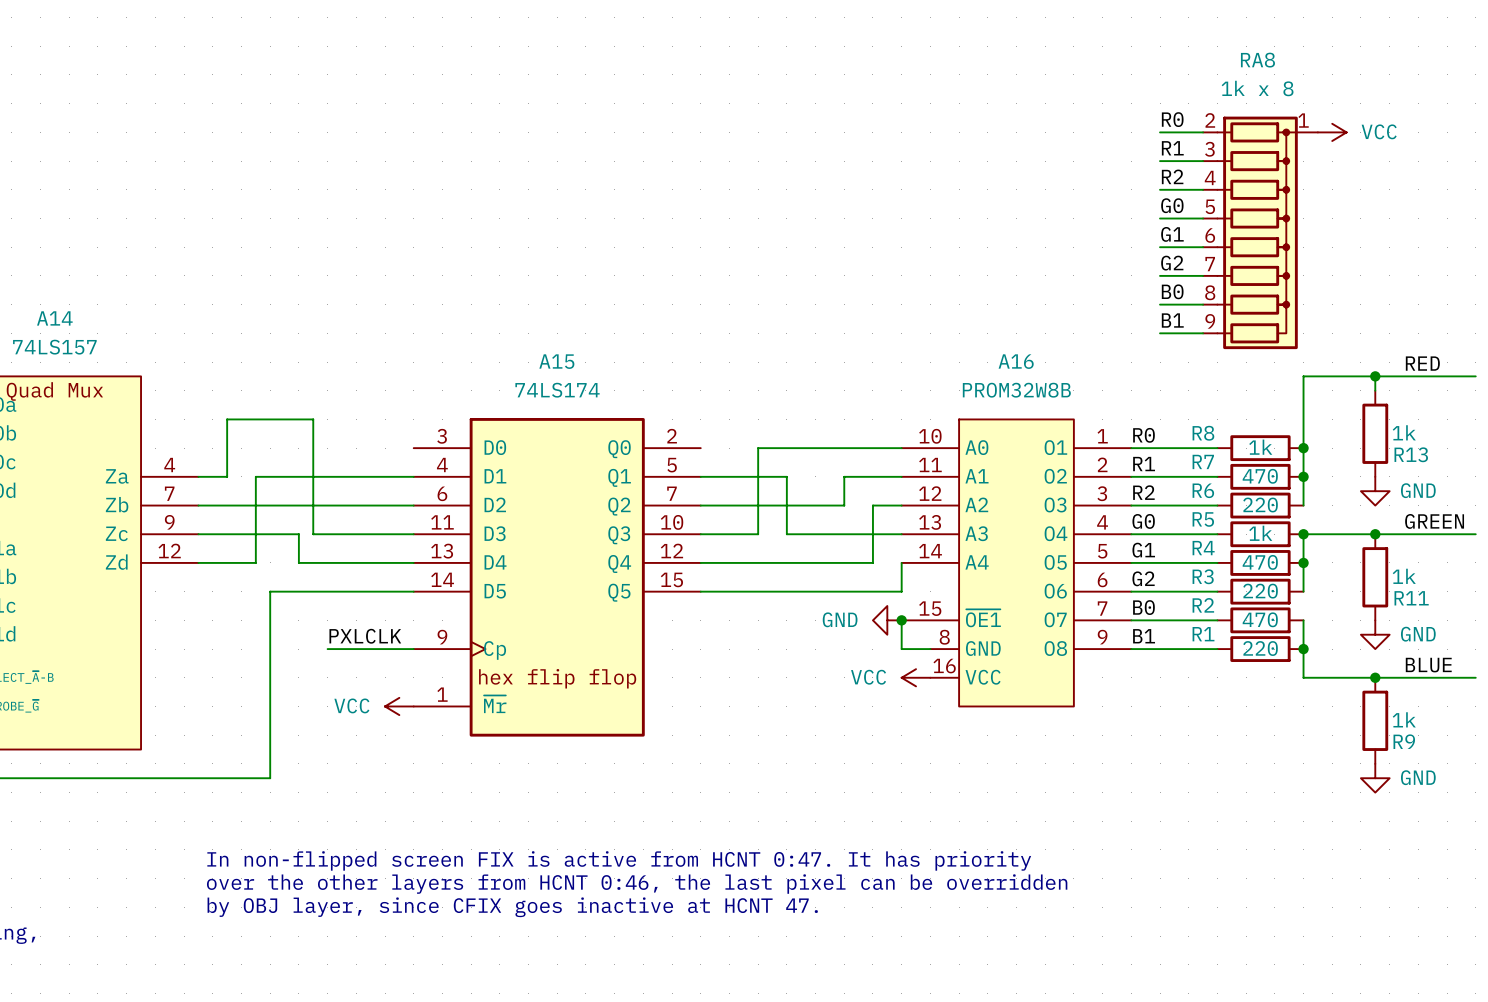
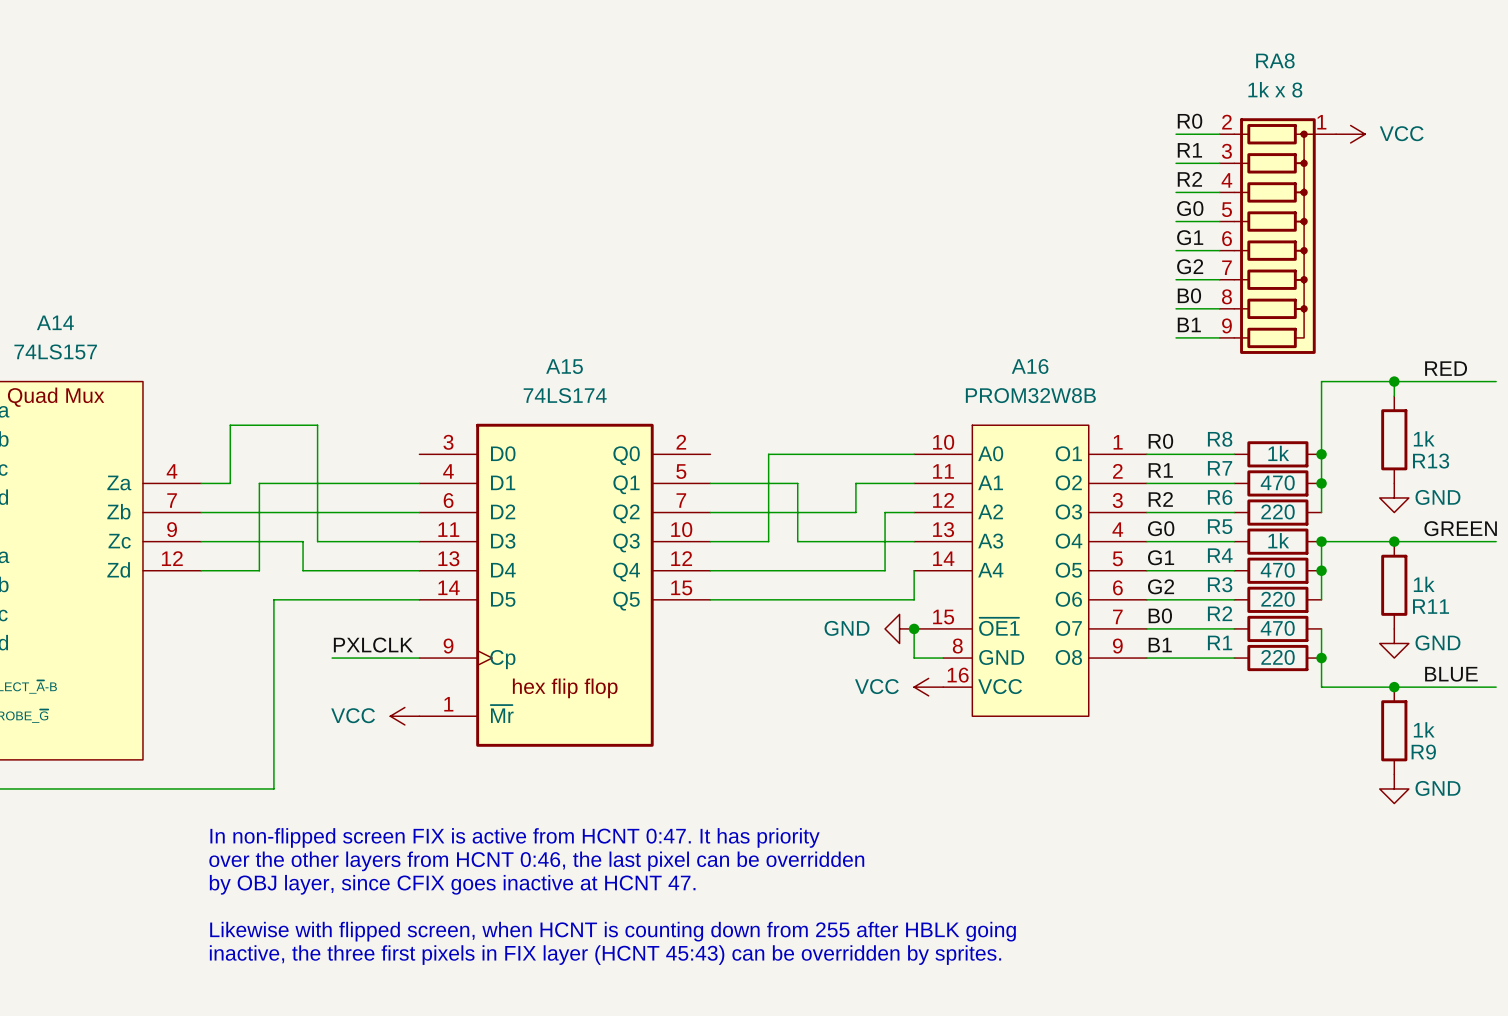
text position: In non-flipped screen FIX is active from HCNT 0:47. It has priority (619, 860) -> In non-flipped screen FIX is active from HCNT 0:47. It has priority (515, 837)
text position: over the other layers from HCNT 0:46, the last pixel can be overridden (637, 884) -> over the other layers from HCNT 0:46, the last pixel can be overridden (536, 861)
text position: by OBJ layer, since CFIX goes inactive at HCNT 47. (512, 907) -> by OBJ layer, since CFIX goes inactive at HCNT 47. (452, 884)
text: none -> Likewise with flipped screen, when HCNT is counting down from 255 after HBLK going (613, 931)
text: none -> inactive, the three first pixels in FIX layer (HCNT 45:43) can be overridden by sprites. (605, 955)

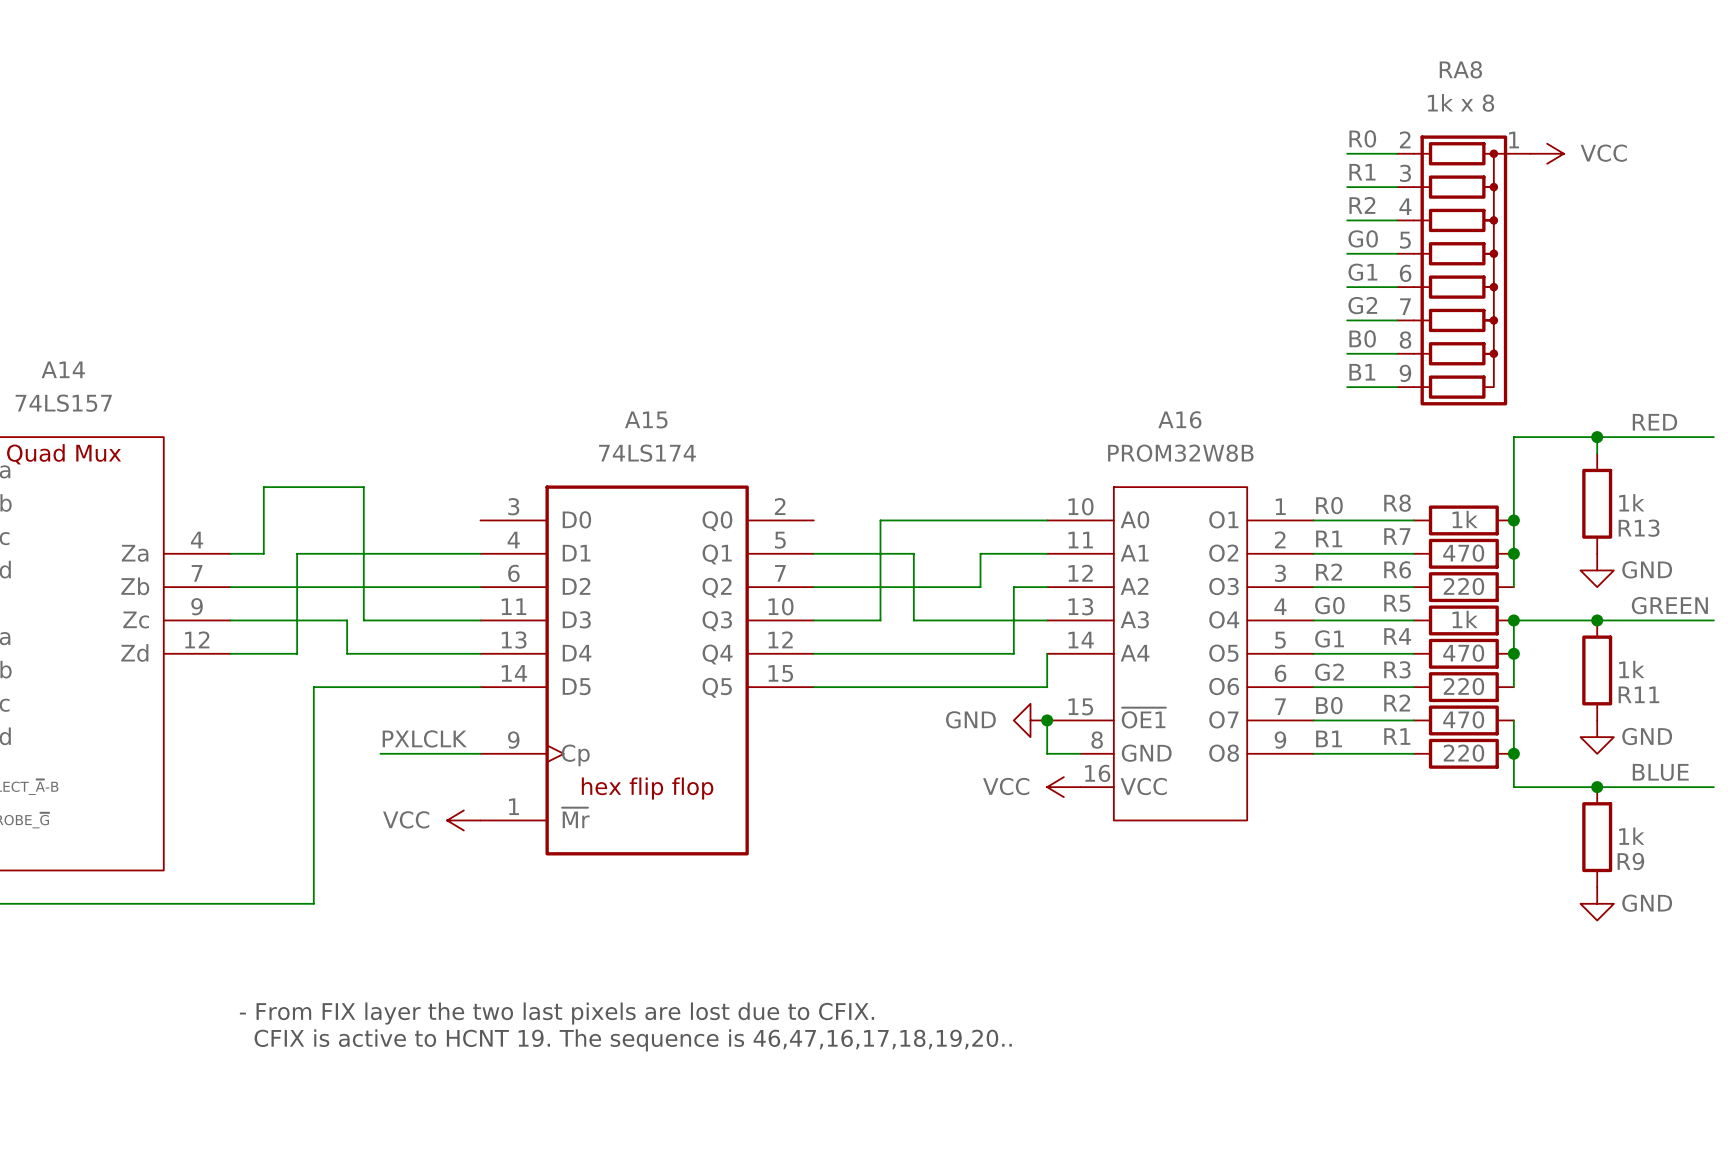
text: In non-flipped screen FIX is active from HCNT 0:47. It has priority (515, 837) -> none
text: over the other layers from HCNT 0:46, the last pixel can be overridden (536, 861) -> none
text: by OBJ layer, since CFIX goes inactive at HCNT 47. (452, 884) -> - From FIX layer the two last pixels are lost due to CFIX. (557, 1013)
text: none -> CFIX is active to HCNT 19. The sequence is 46,47,16,17,18,19,20.. (633, 1040)
text: Likewise with flipped screen, when HCNT is counting down from 255 after HBLK going (613, 931) -> none
text: inactive, the three first pixels in FIX layer (HCNT 45:43) can be overridden by sprites. (605, 955) -> none

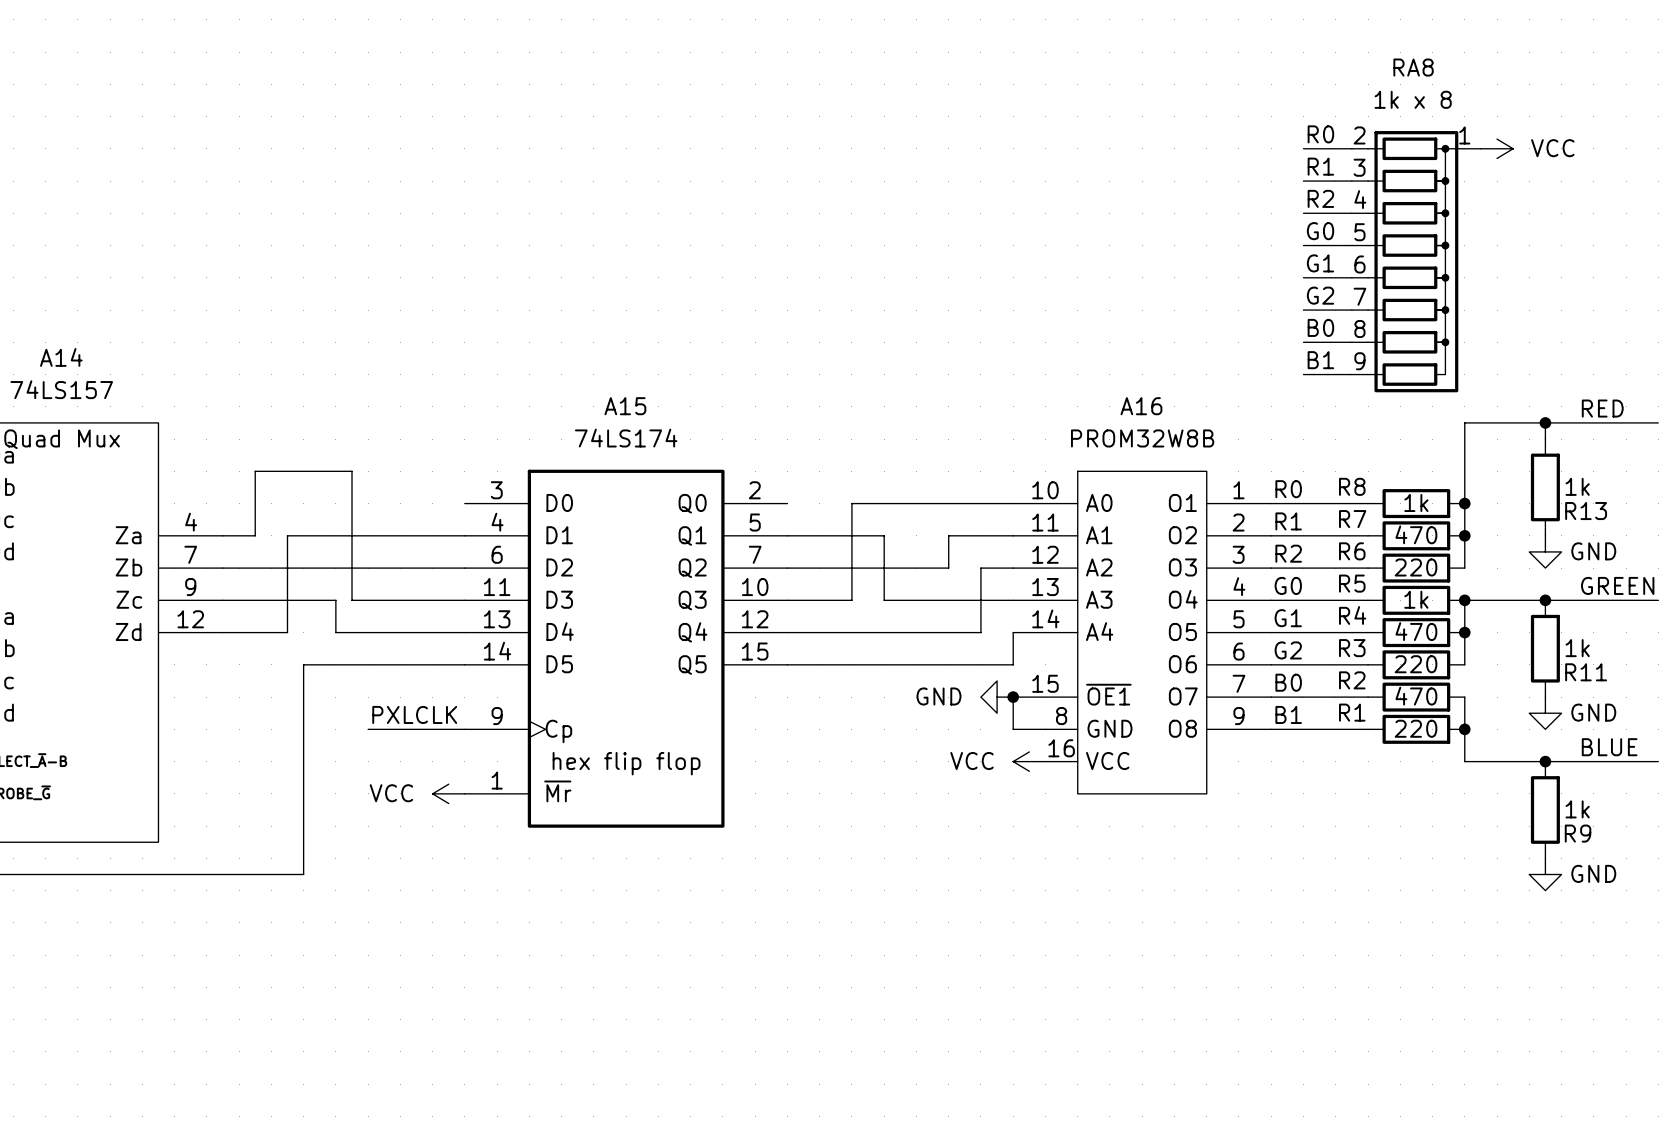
text: - From FIX layer the two last pixels are lost due to CFIX. (557, 1013) -> none
text: CFIX is active to HCNT 19. The sequence is 46,47,16,17,18,19,20.. (633, 1040) -> none

